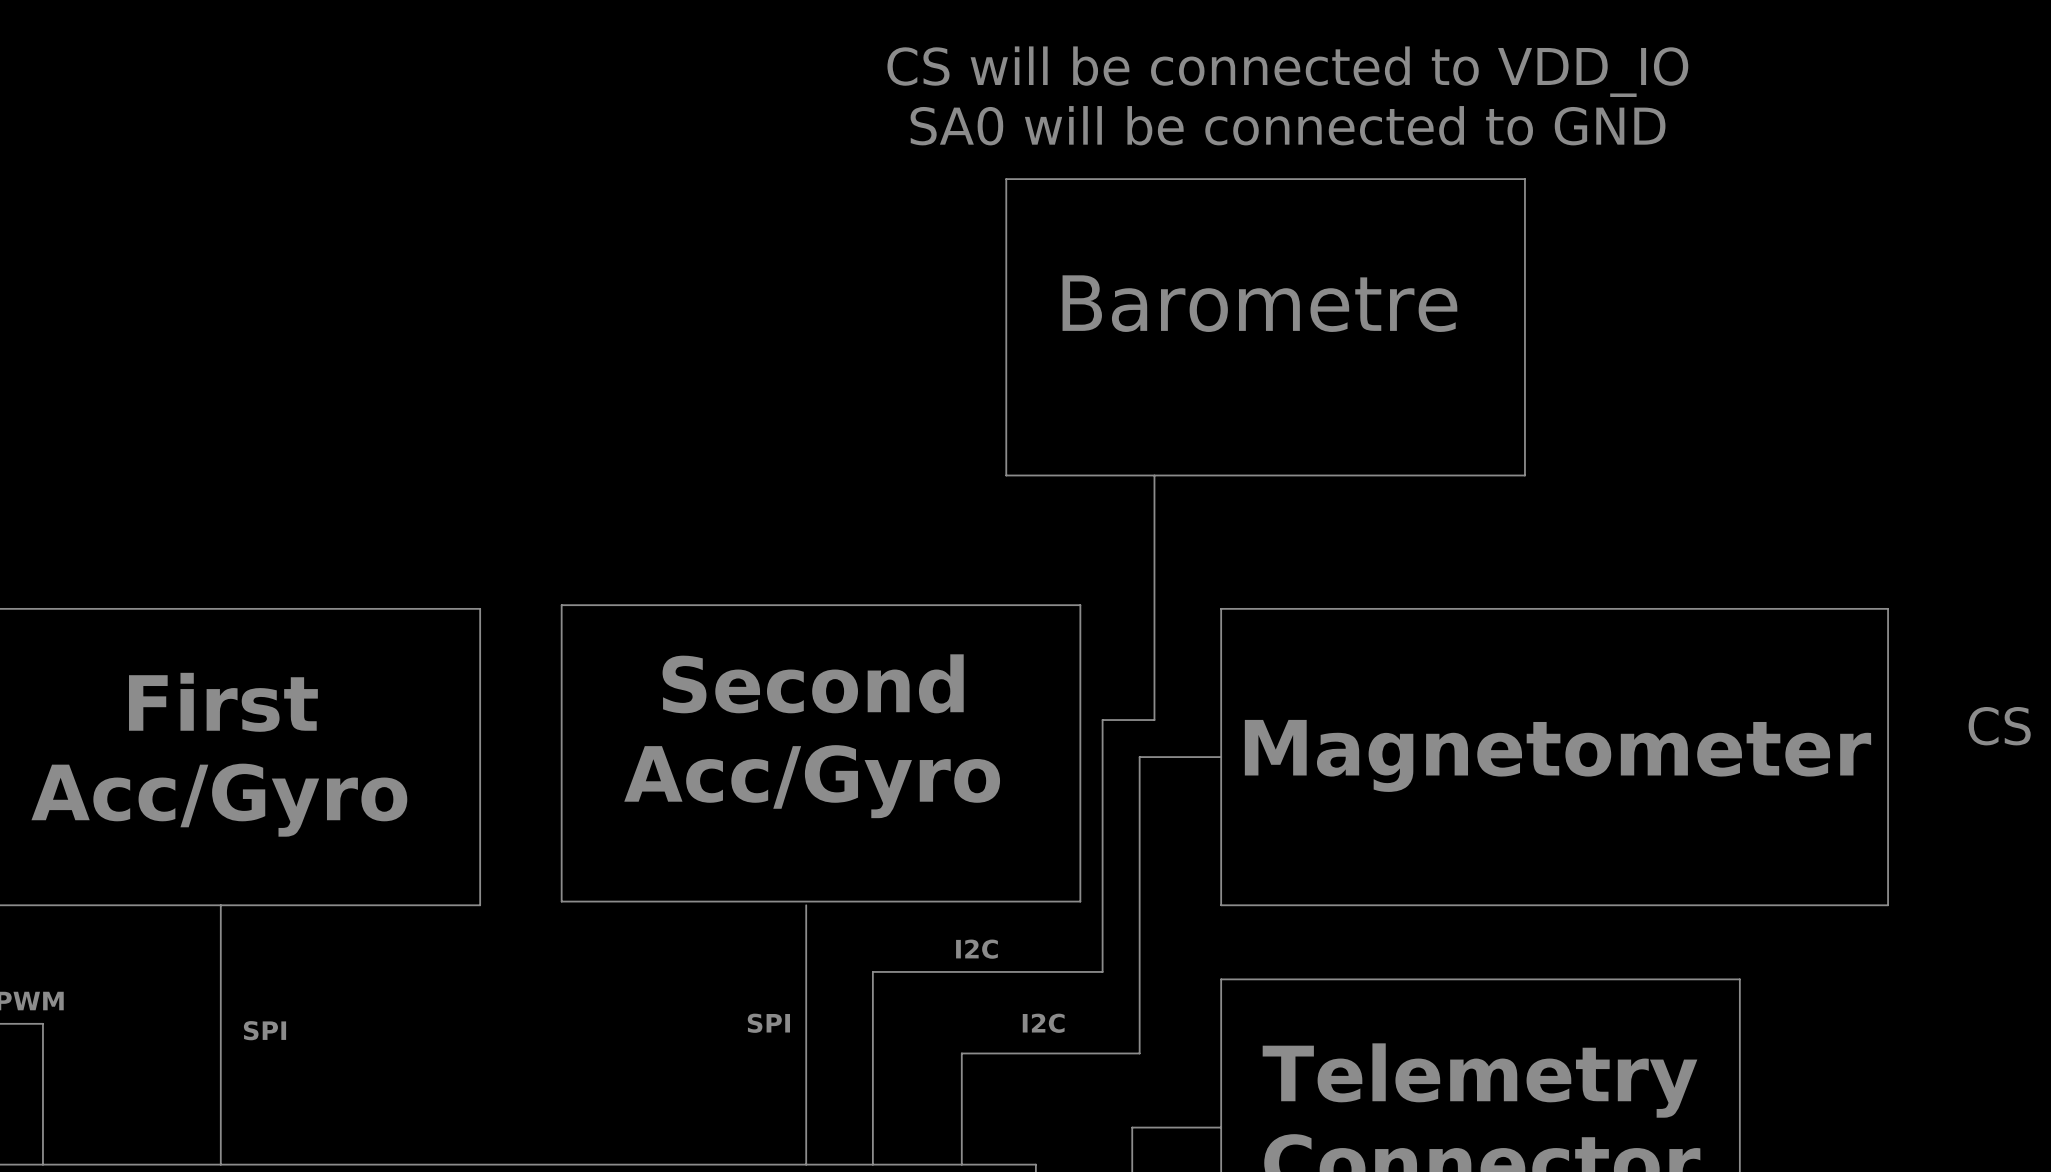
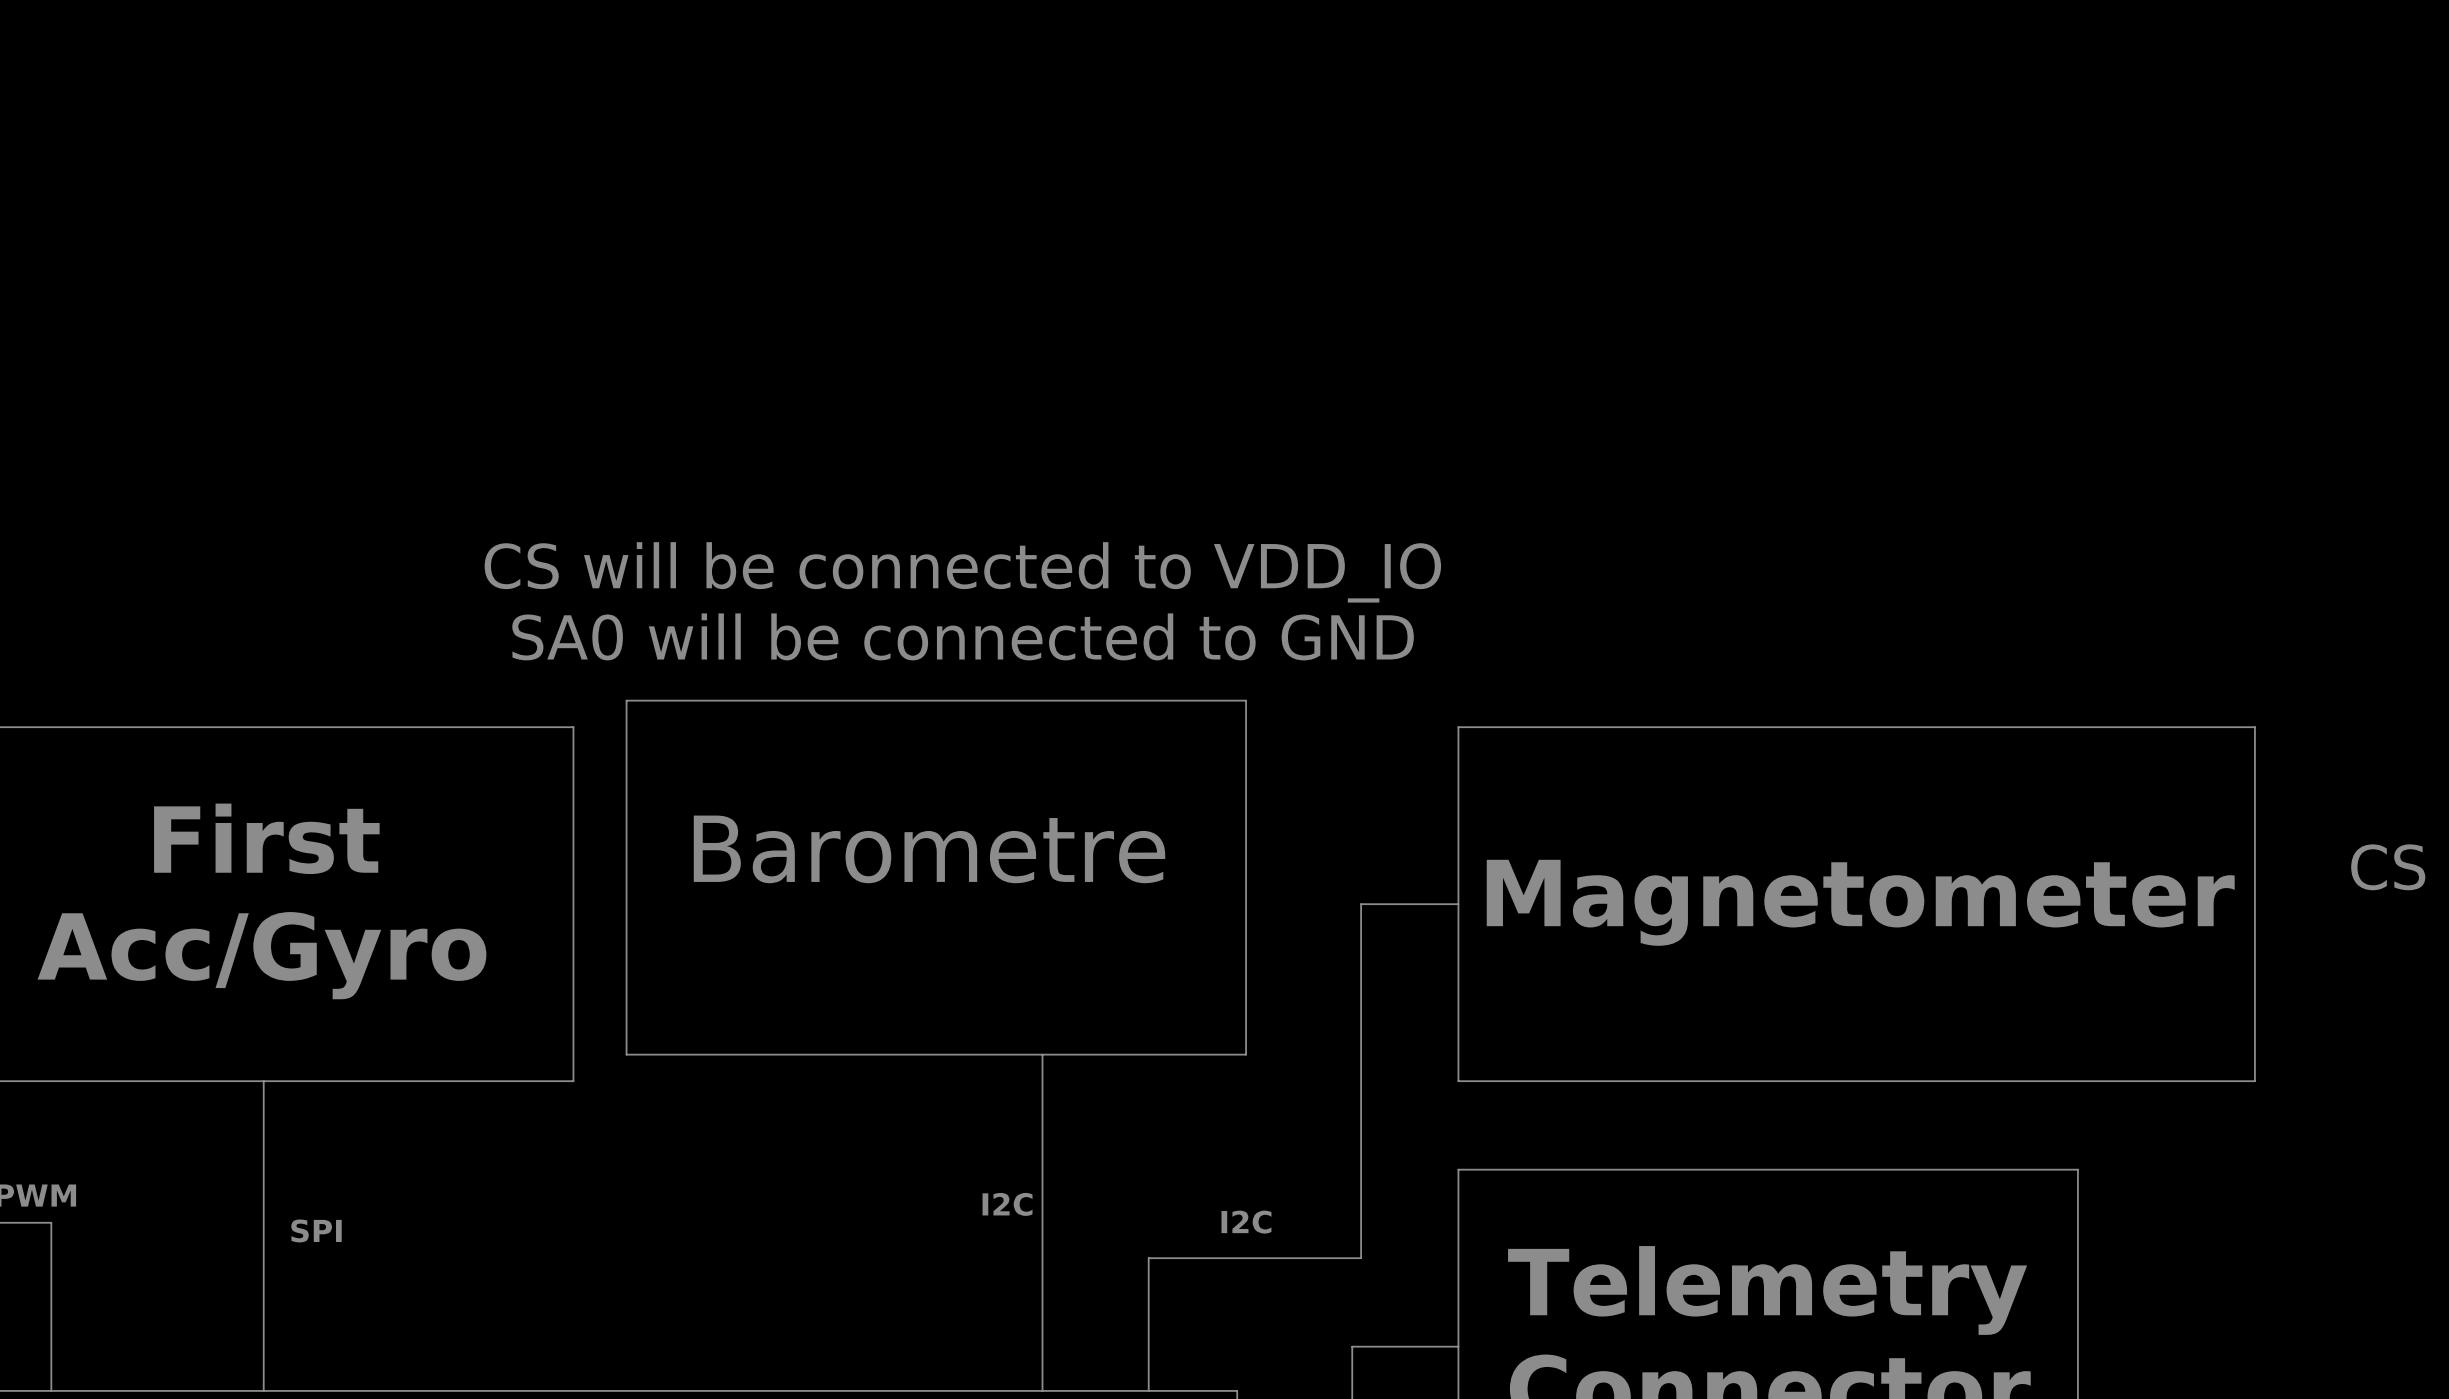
text position: CS will be connected to VDD_IO (1287, 71) -> CS will be connected to VDD_IO (962, 572)
text position: SA0 will be connected to GND (1288, 125) -> SA0 will be connected to GND (963, 636)
line: (1006, 179) (1524, 179) (1524, 475) (1006, 475) (1006, 179) -> none
text position: Barometre (1259, 303) -> Barometre (929, 849)
line: (1154, 475) (1154, 720) (1102, 720) (1102, 971) (872, 971) -> (1042, 1054) (1042, 1160)
line: (561, 605) (1080, 605) (1080, 901) (561, 901) (561, 605) -> (626, 700) (1246, 700) (1246, 1054) (626, 1054) (626, 700)
text: Second (813, 683) -> none
text: Acc/Gyro (812, 781) -> none
line: (806, 905) (806, 1164) -> none
text position: I2C (976, 949) -> I2C (1007, 1204)
text: SPI (768, 1023) -> none

